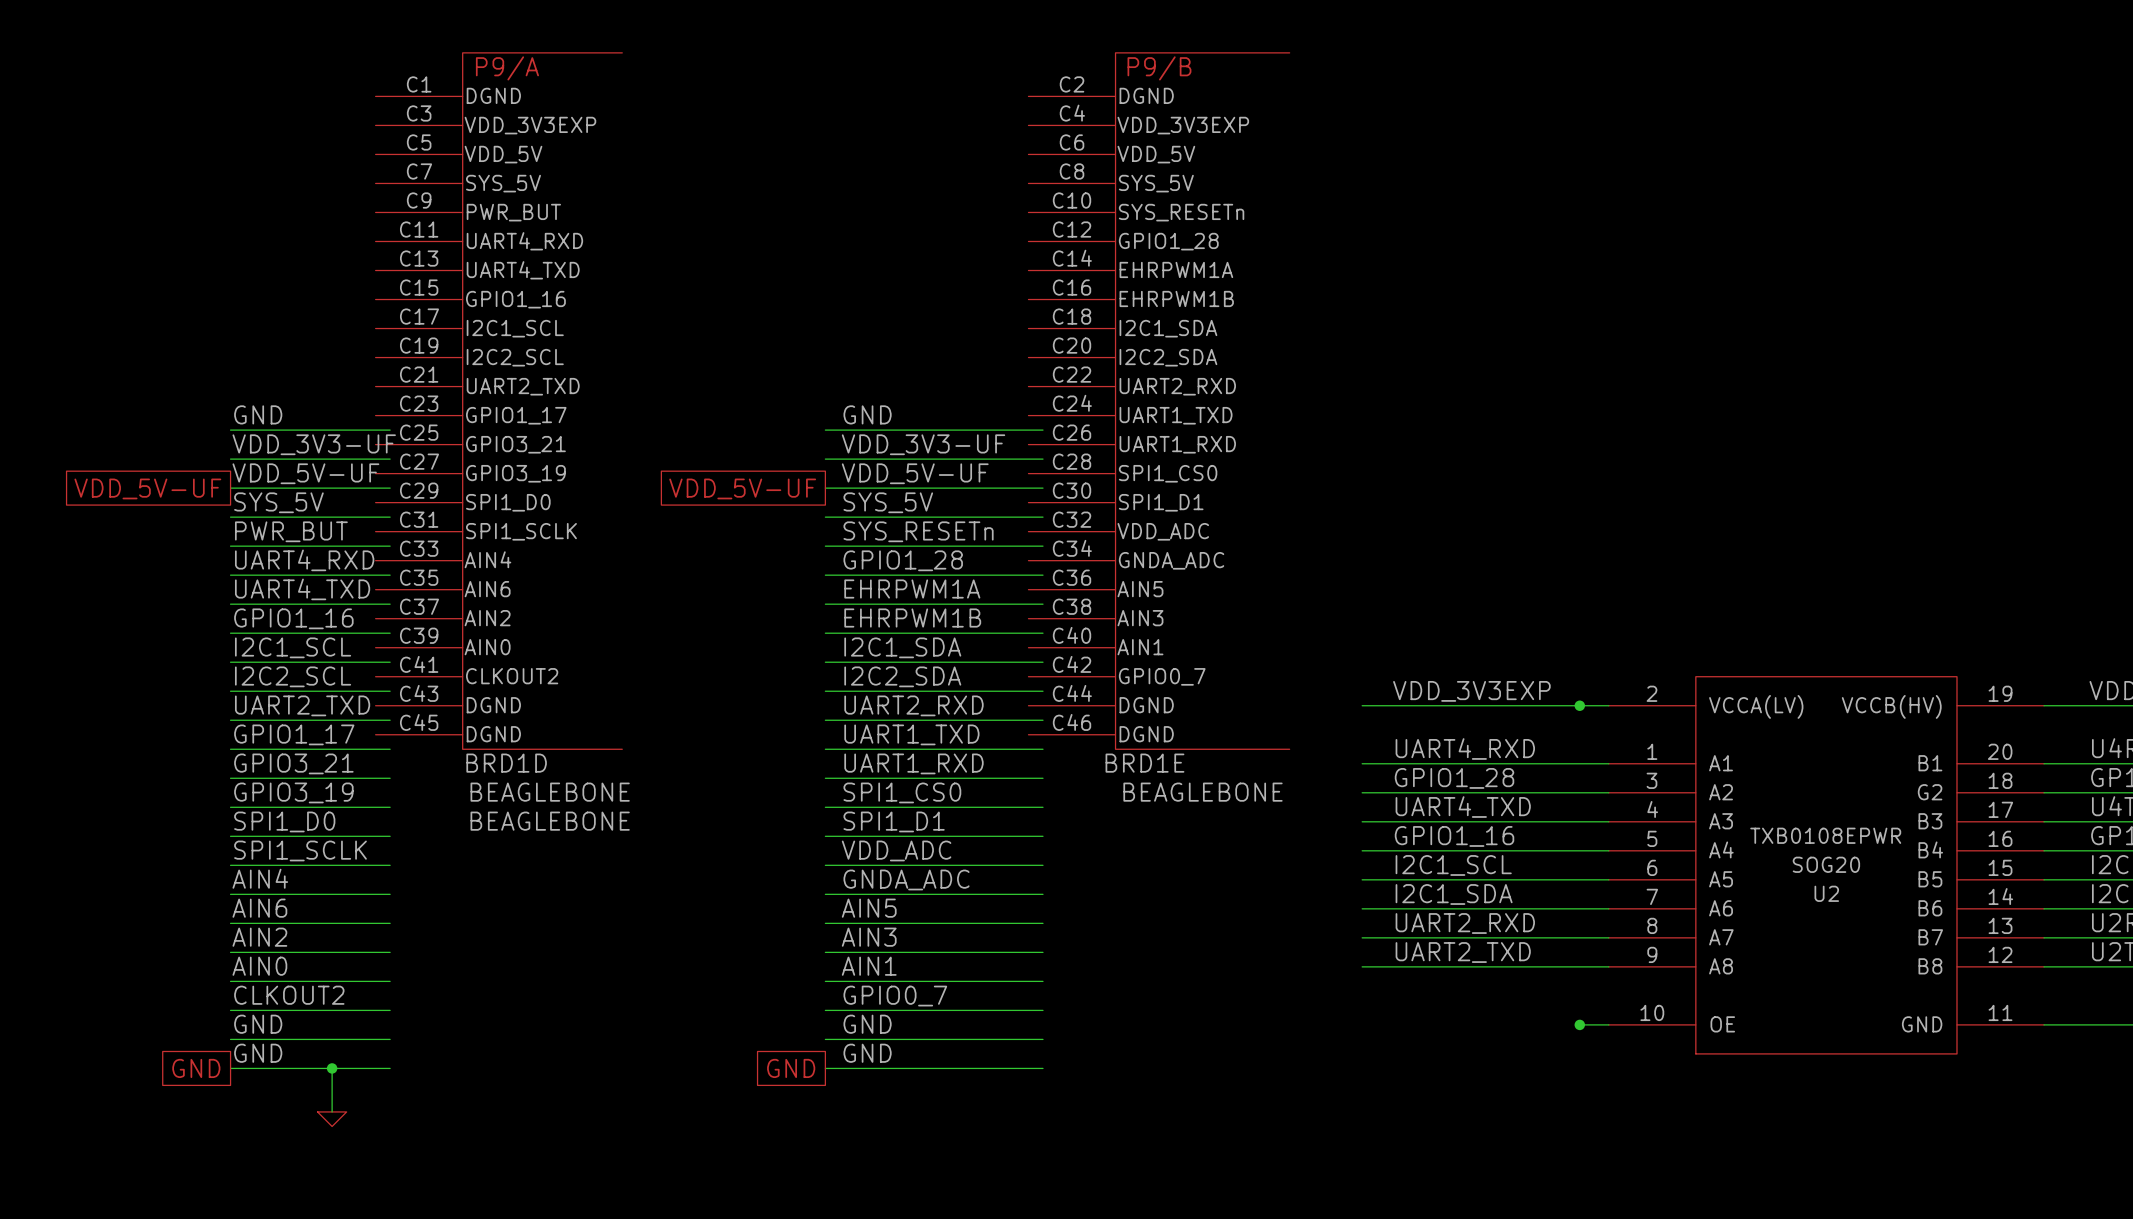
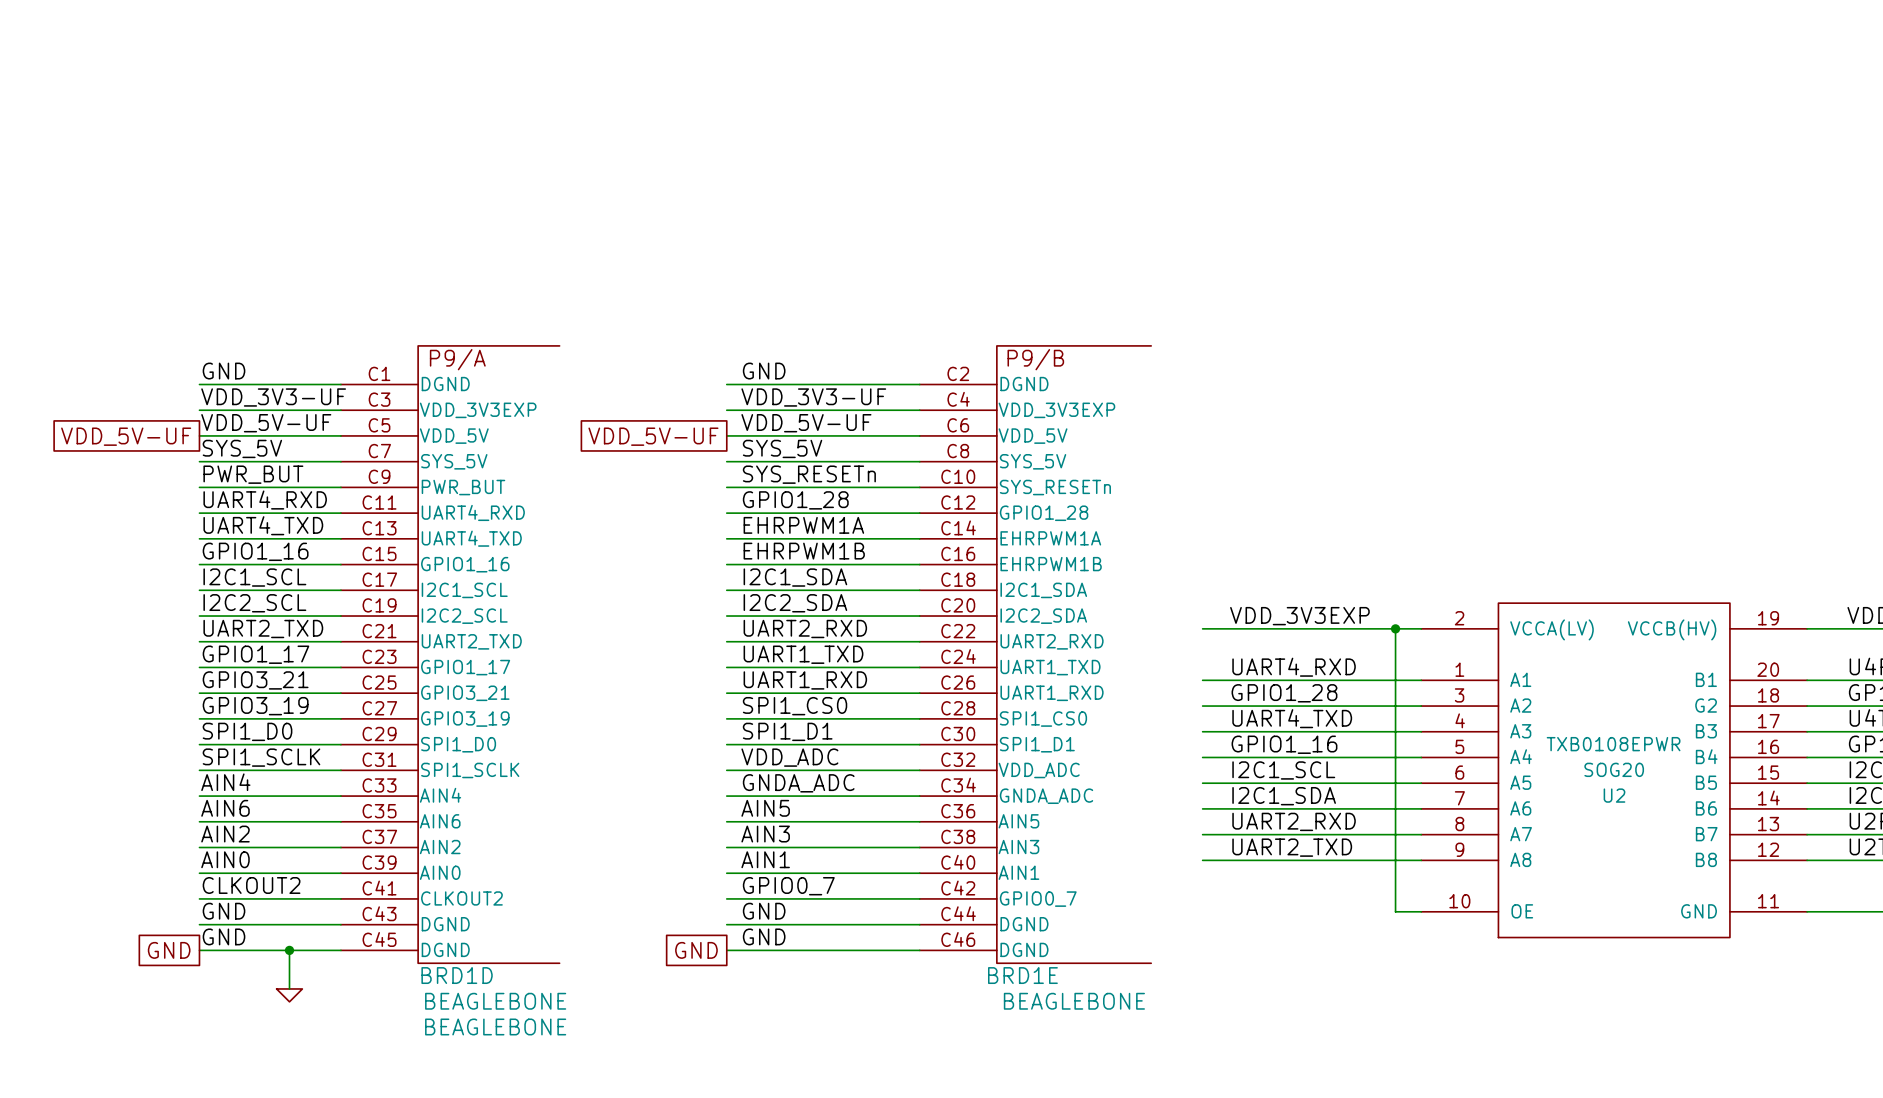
BRD1D position: (498, 401) -> (450, 654)
BRD1E position: (1159, 401) -> (1035, 654)
wire: none -> (1395, 628) (1395, 911)
junction: (1579, 1024) -> none

